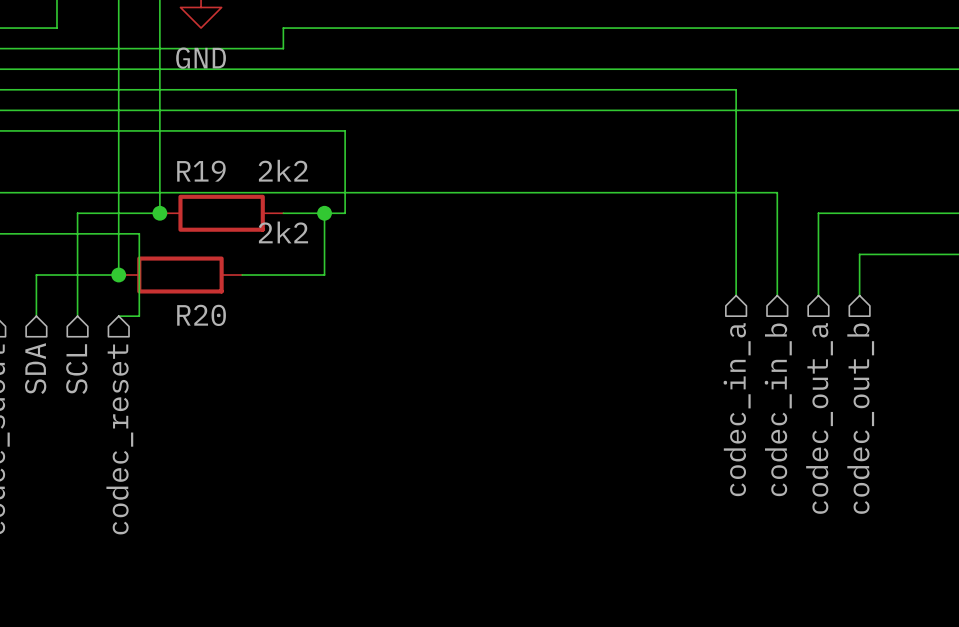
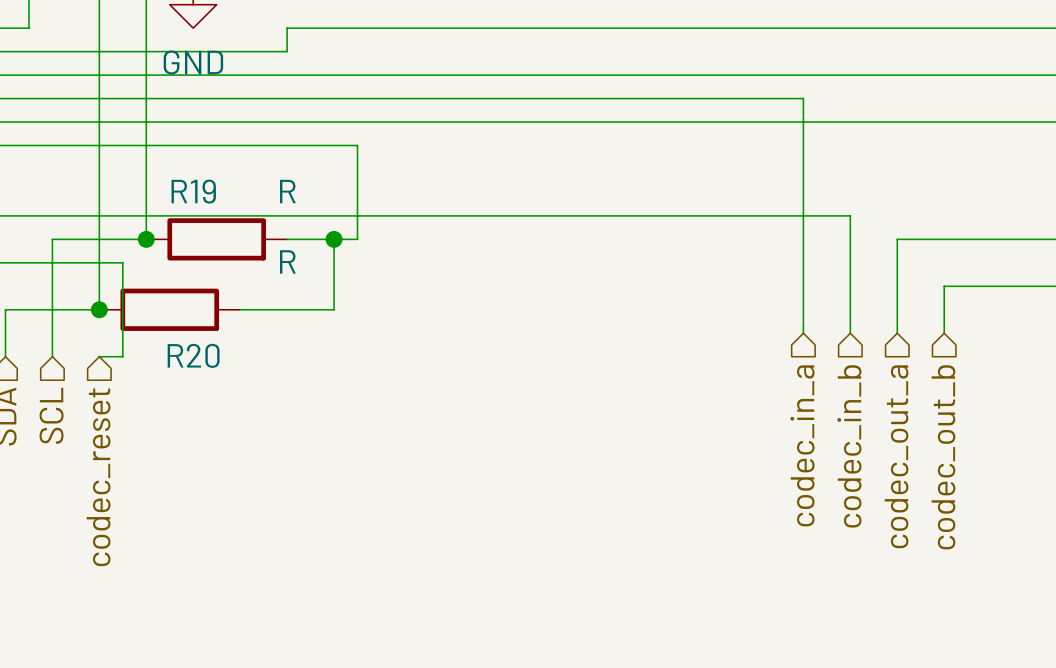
R19 value: 2k2 (283, 170) -> R (287, 191)
R20 value: 2k2 (283, 232) -> R (287, 261)

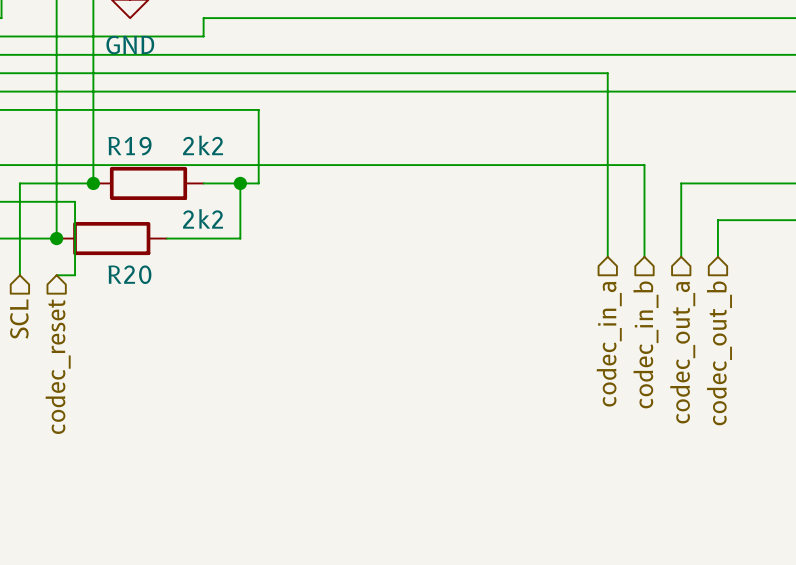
R19 value: R (287, 191) -> 2k2 (203, 145)
R20 value: R (287, 261) -> 2k2 (203, 218)

